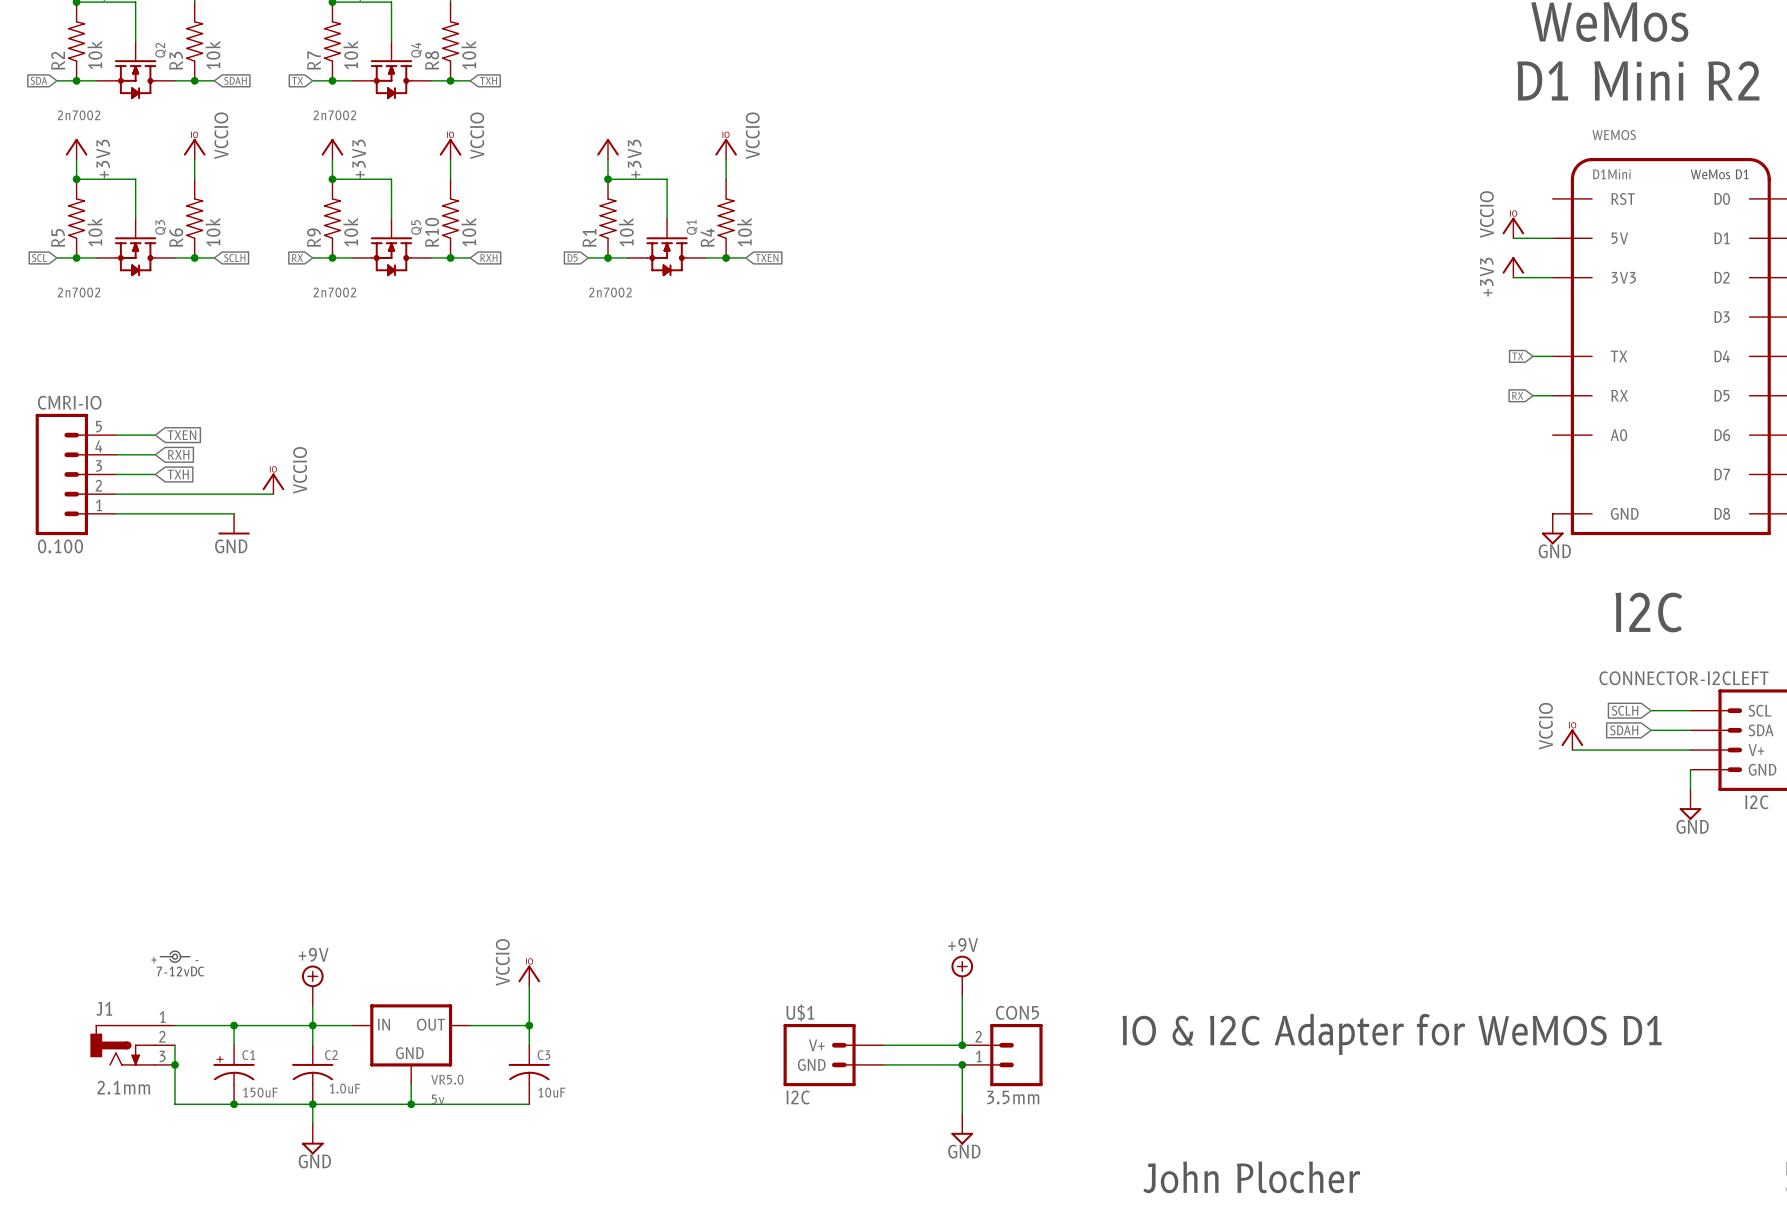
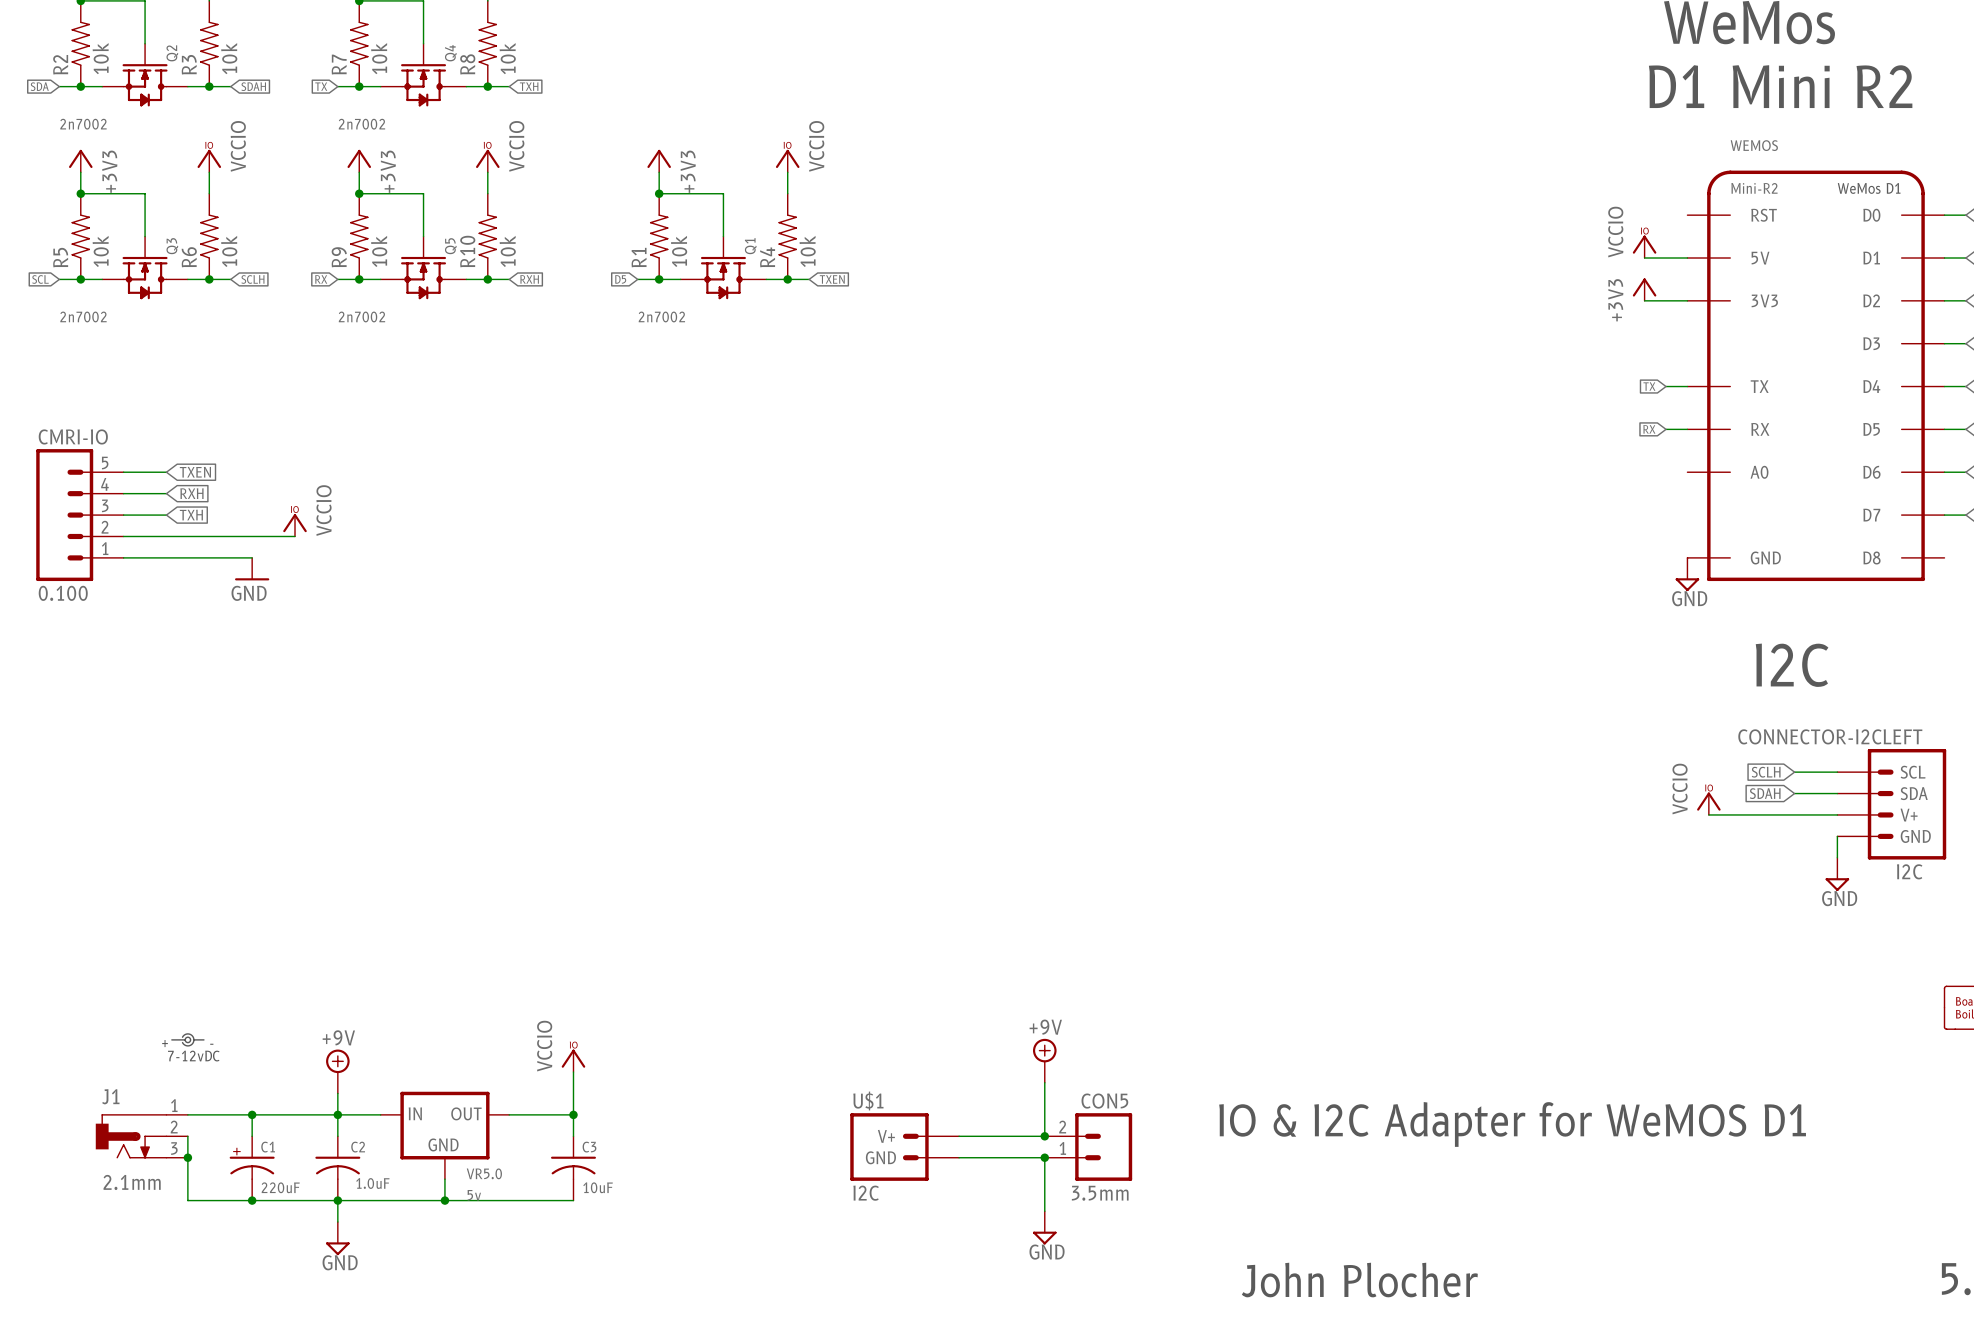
WEMOS value: D1Mini (1611, 174) -> Mini-R2 (1754, 188)
C1 value: 150uF (260, 1092) -> 220uF (280, 1187)

